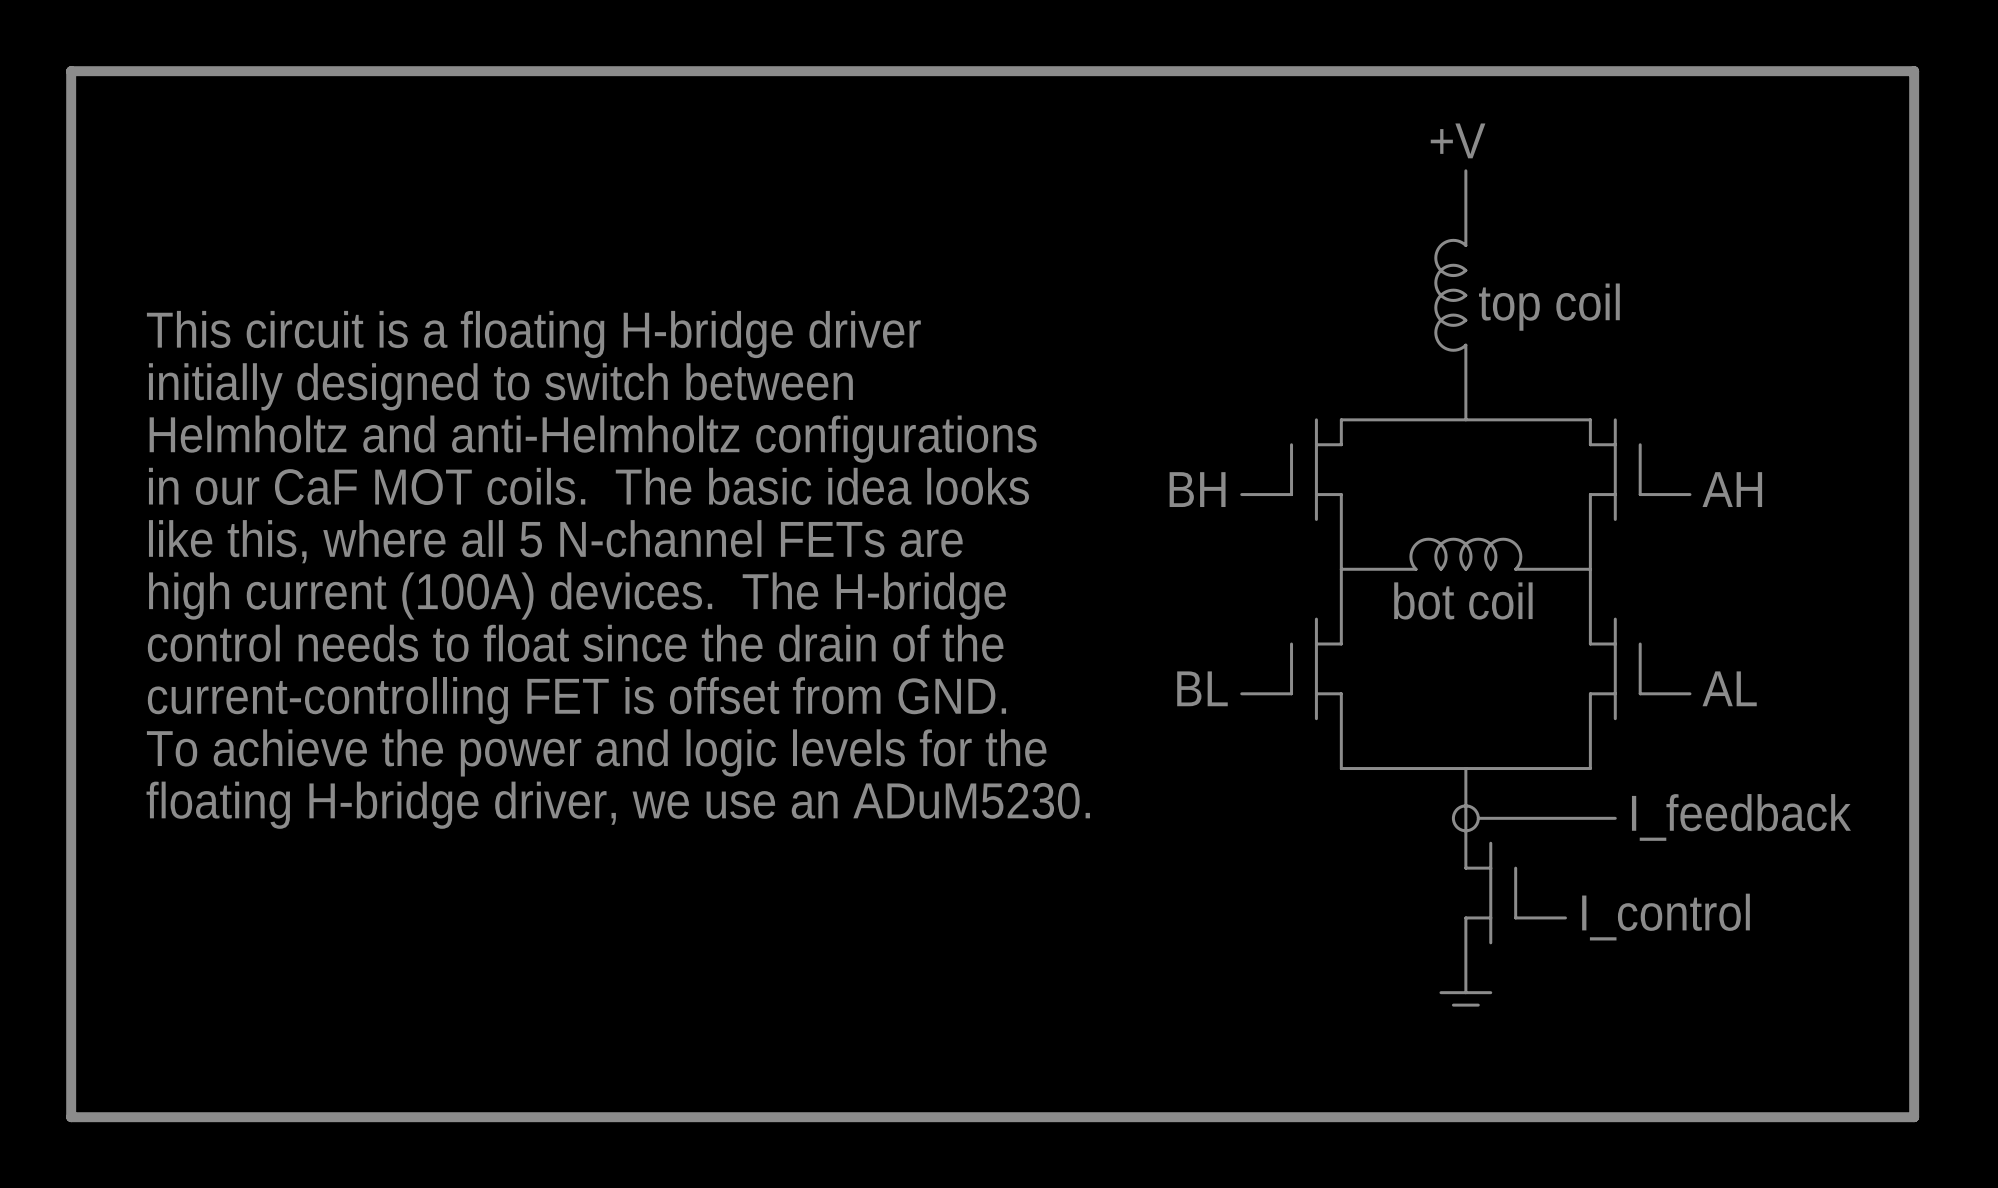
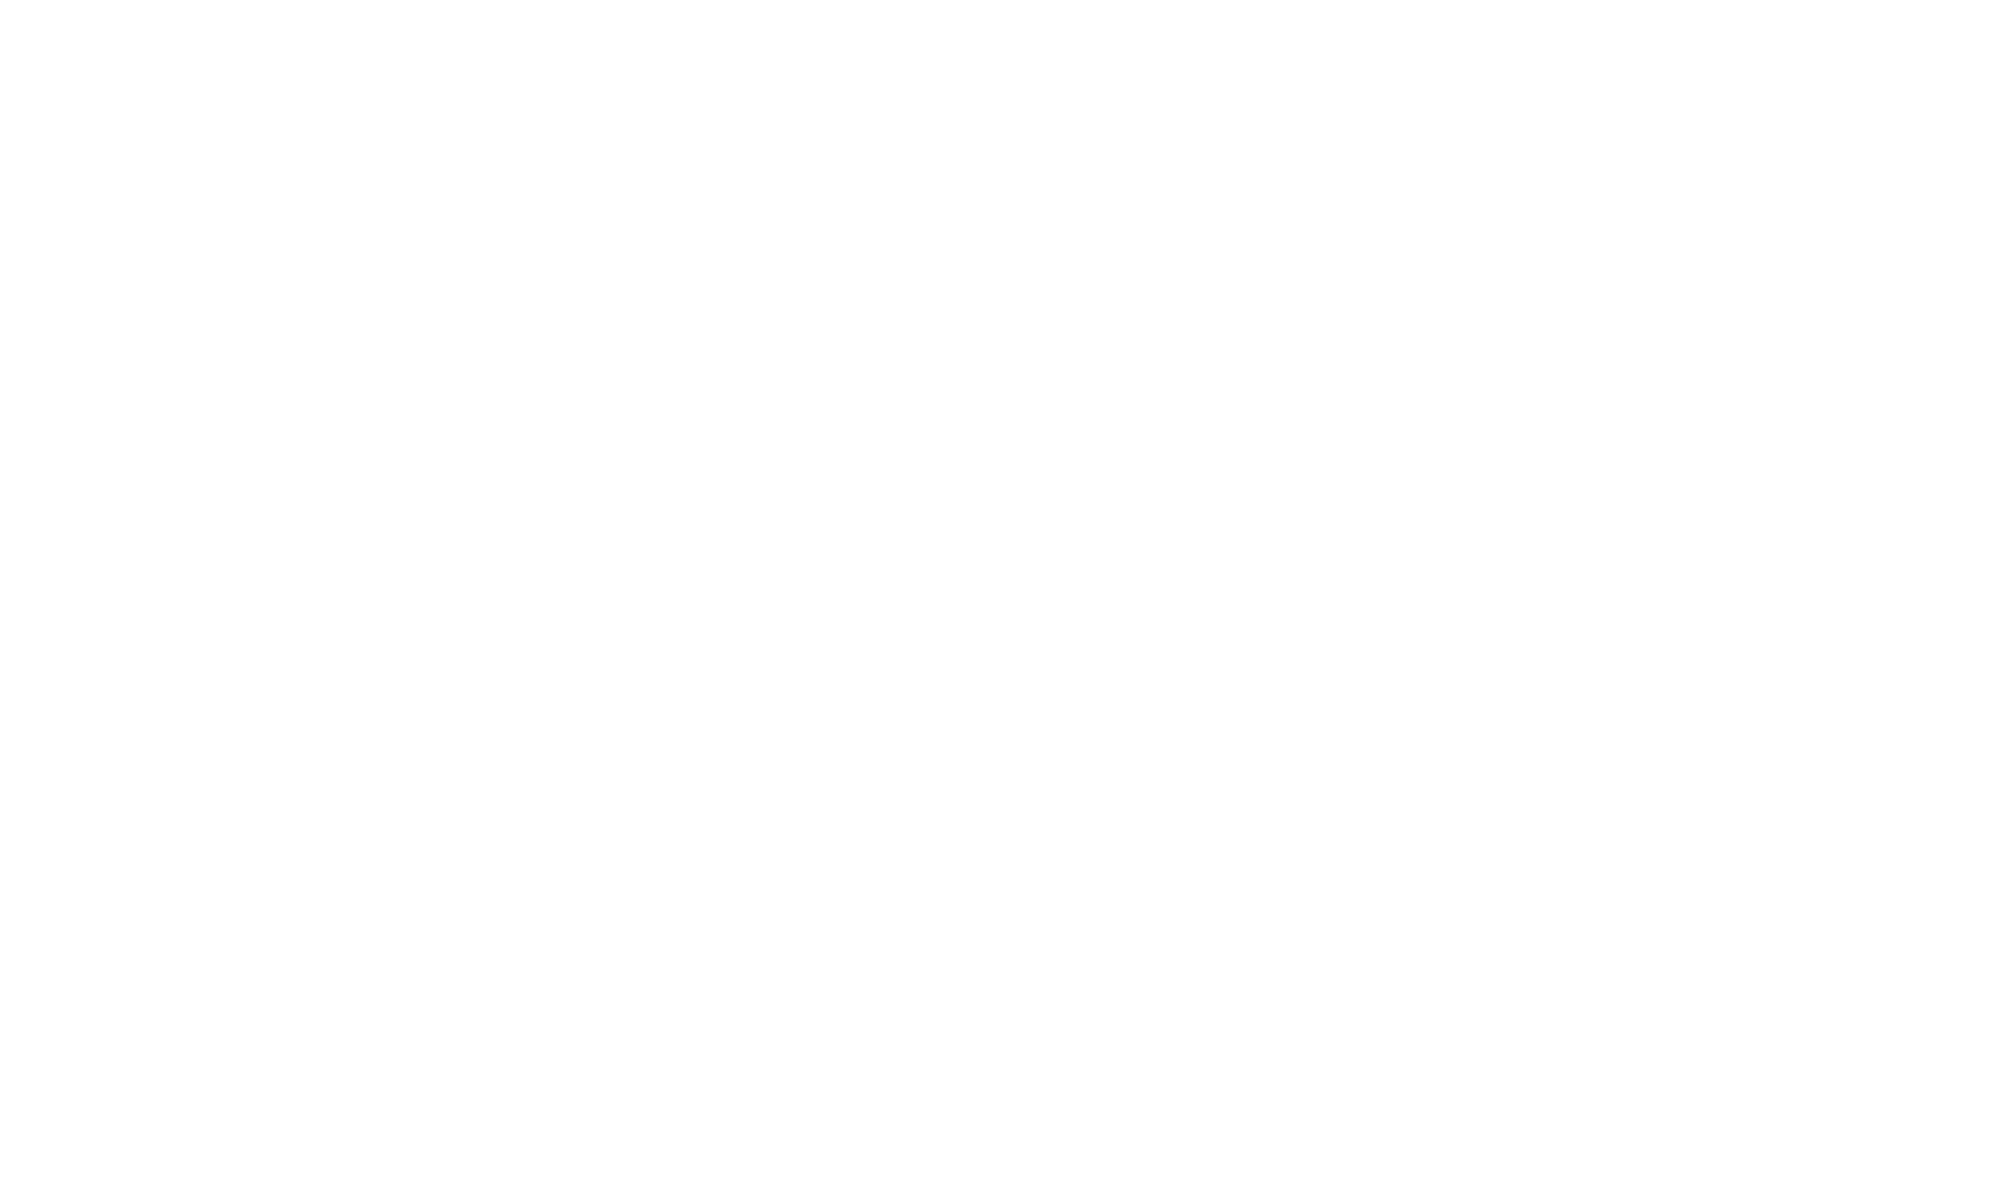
line: (71, 71) (1914, 71) (1914, 1117) (71, 1117) (71, 71) -> none
text: +V (1458, 140) -> none
line: (1465, 170) (1465, 245) (1457, 240) (1446, 241) (1439, 247) (1435, 257) (1439, 268) (1440, 270) (1442, 271) (1446, 274) (1457, 274) (1465, 270) (1457, 265) (1446, 266) (1442, 268) (1440, 270) (1439, 272) (1435, 282) (1439, 293) (1440, 295) (1442, 296) (1446, 299) (1457, 299) (1465, 295) (1457, 290) (1446, 291) (1442, 293) (1440, 295) (1439, 297) (1435, 307) (1439, 318) (1440, 320) (1442, 321) (1446, 324) (1457, 324) (1465, 320) (1457, 315) (1446, 316) (1442, 318) (1440, 320) (1439, 321) (1435, 332) (1439, 343) (1446, 348) (1457, 349) (1465, 345) (1465, 419) -> none
text: top coil (1549, 307) -> none
text: This circuit is a floating H-bridge driver (533, 334) -> none
text: initially designed to switch between (500, 386) -> none
line: (1316, 419) (1316, 519) -> none
line: (1615, 419) (1615, 519) -> none
text: Helmholtz and anti-Helmholtz configurations (593, 439) -> none
line: (1291, 444) (1291, 494) (1241, 494) -> none
line: (1316, 444) (1341, 444) (1341, 419) (1590, 419) (1590, 444) (1615, 444) -> none
line: (1640, 444) (1640, 494) (1690, 494) -> none
text: in our CaF MOT coils. The basic idea looks (588, 486) -> none
text: BH (1197, 489) -> none
text: AH (1732, 489) -> none
line: (1316, 494) (1341, 494) (1341, 643) (1316, 643) -> none
line: (1615, 494) (1590, 494) (1590, 643) (1615, 643) -> none
text: like this, where all 5 N-channel FETs are (555, 541) -> none
line: (1341, 569) (1416, 569) (1411, 561) (1412, 550) (1417, 542) (1428, 539) (1439, 542) (1440, 544) (1442, 546) (1444, 550) (1445, 561) (1440, 569) (1436, 561) (1437, 550) (1439, 546) (1440, 544) (1442, 542) (1453, 539) (1464, 542) (1465, 544) (1467, 546) (1469, 550) (1470, 561) (1465, 569) (1461, 561) (1462, 550) (1464, 546) (1465, 544) (1467, 542) (1478, 539) (1489, 542) (1490, 544) (1492, 546) (1494, 550) (1495, 561) (1490, 569) (1486, 561) (1486, 550) (1489, 546) (1490, 544) (1492, 542) (1503, 539) (1513, 542) (1519, 550) (1520, 561) (1515, 569) (1590, 569) -> none
text: high current (100A) devices. The H-bridge (577, 596) -> none
text: bot coil (1463, 600) -> none
line: (1316, 619) (1316, 718) -> none
line: (1615, 619) (1615, 718) -> none
text: control needs to float since the drain of the (575, 643) -> none
line: (1291, 643) (1291, 693) (1241, 693) -> none
line: (1640, 643) (1640, 693) (1690, 693) -> none
text: BL (1202, 688) -> none
text: AL (1729, 688) -> none
line: (1316, 693) (1341, 693) (1341, 768) (1590, 768) (1590, 693) (1615, 693) -> none
text: current-controlling FET is offset from GND. (576, 700) -> none
text: To achieve the power and logic levels for the (596, 752) -> none
line: (1465, 768) (1465, 868) (1490, 868) -> none
drawing: [1451, 804, 1480, 833] -> none
text: floating H-bridge driver, we use an ADuM5230. (618, 805) -> none
text: I_feedback (1741, 817) -> none
line: (1478, 818) (1615, 818) -> none
line: (1490, 843) (1490, 942) -> none
line: (1515, 868) (1515, 917) (1565, 917) -> none
line: (1490, 917) (1465, 917) (1465, 992) -> none
text: I_control (1665, 917) -> none
line: (1440, 992) (1490, 992) -> none
line: (1453, 1005) (1478, 1005) -> none

